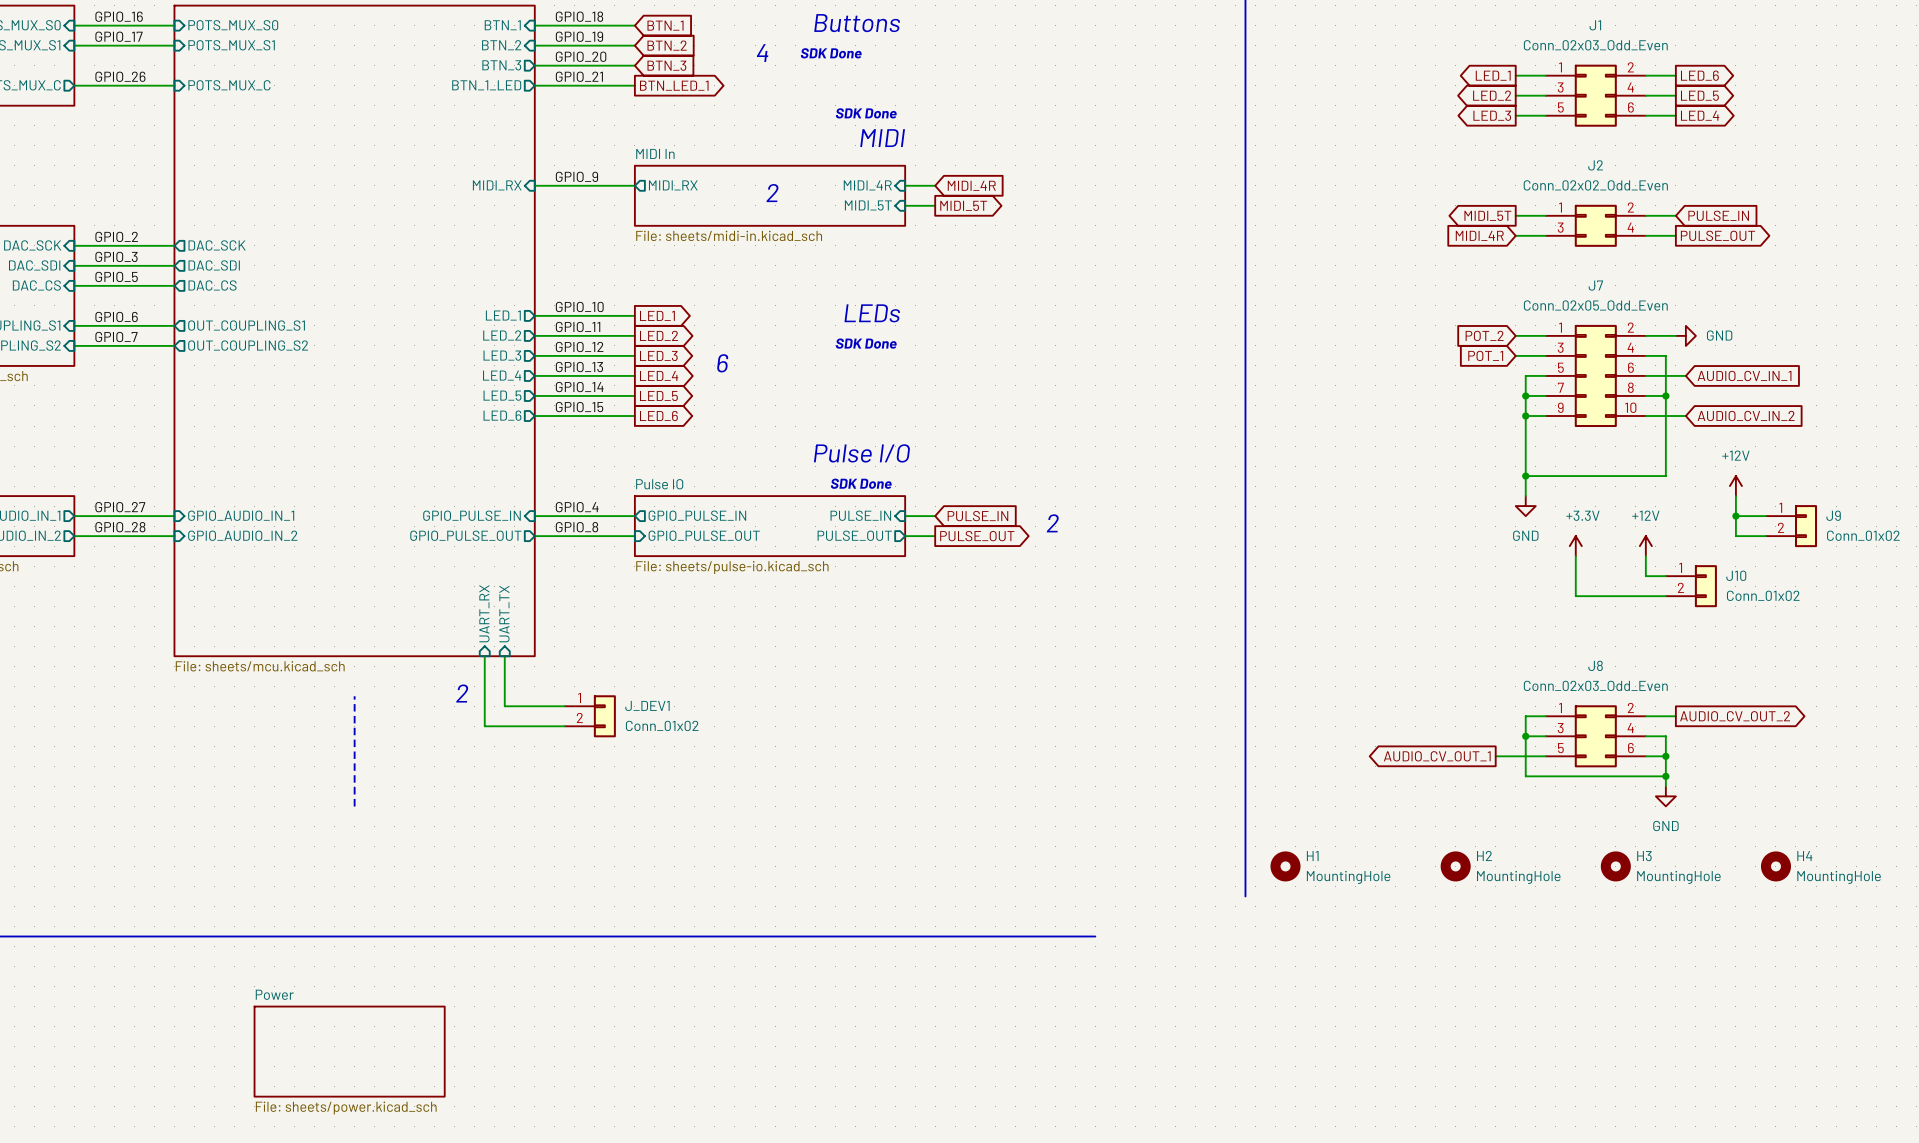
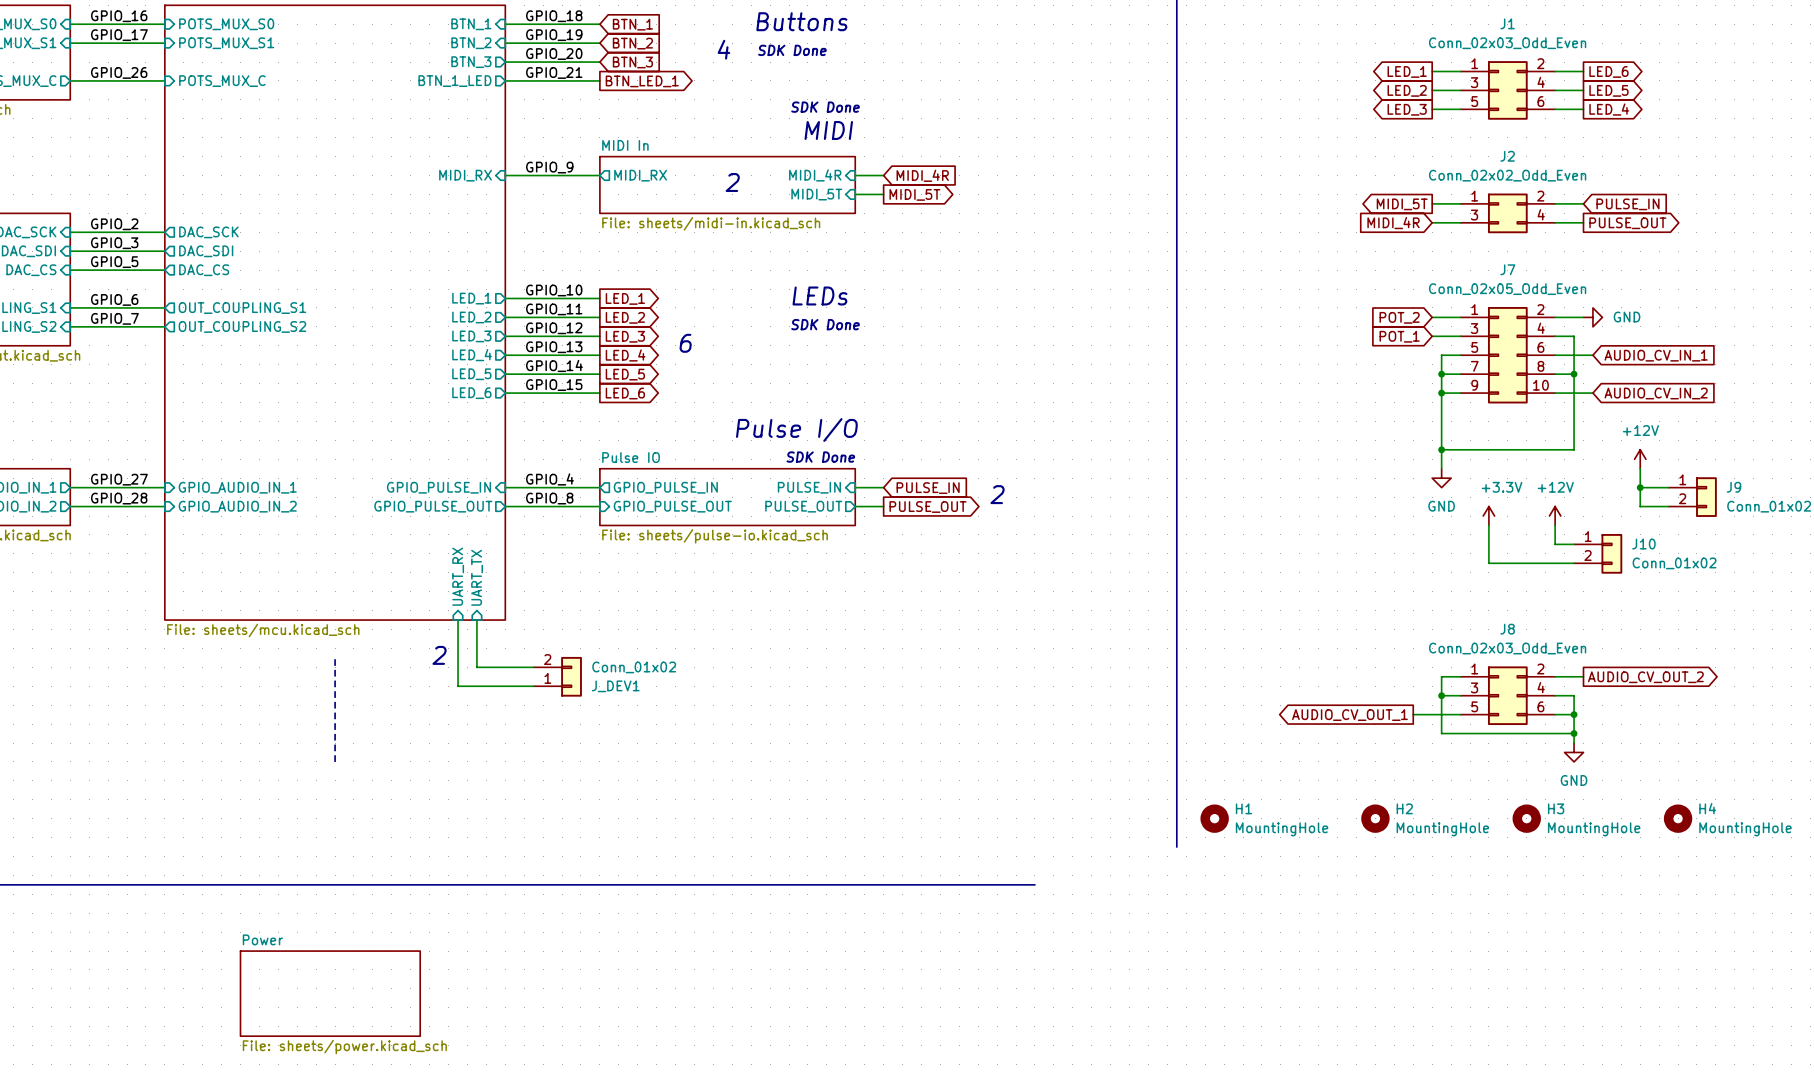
J_DEV1 flip: as is (604, 716) -> up-down (571, 676)

